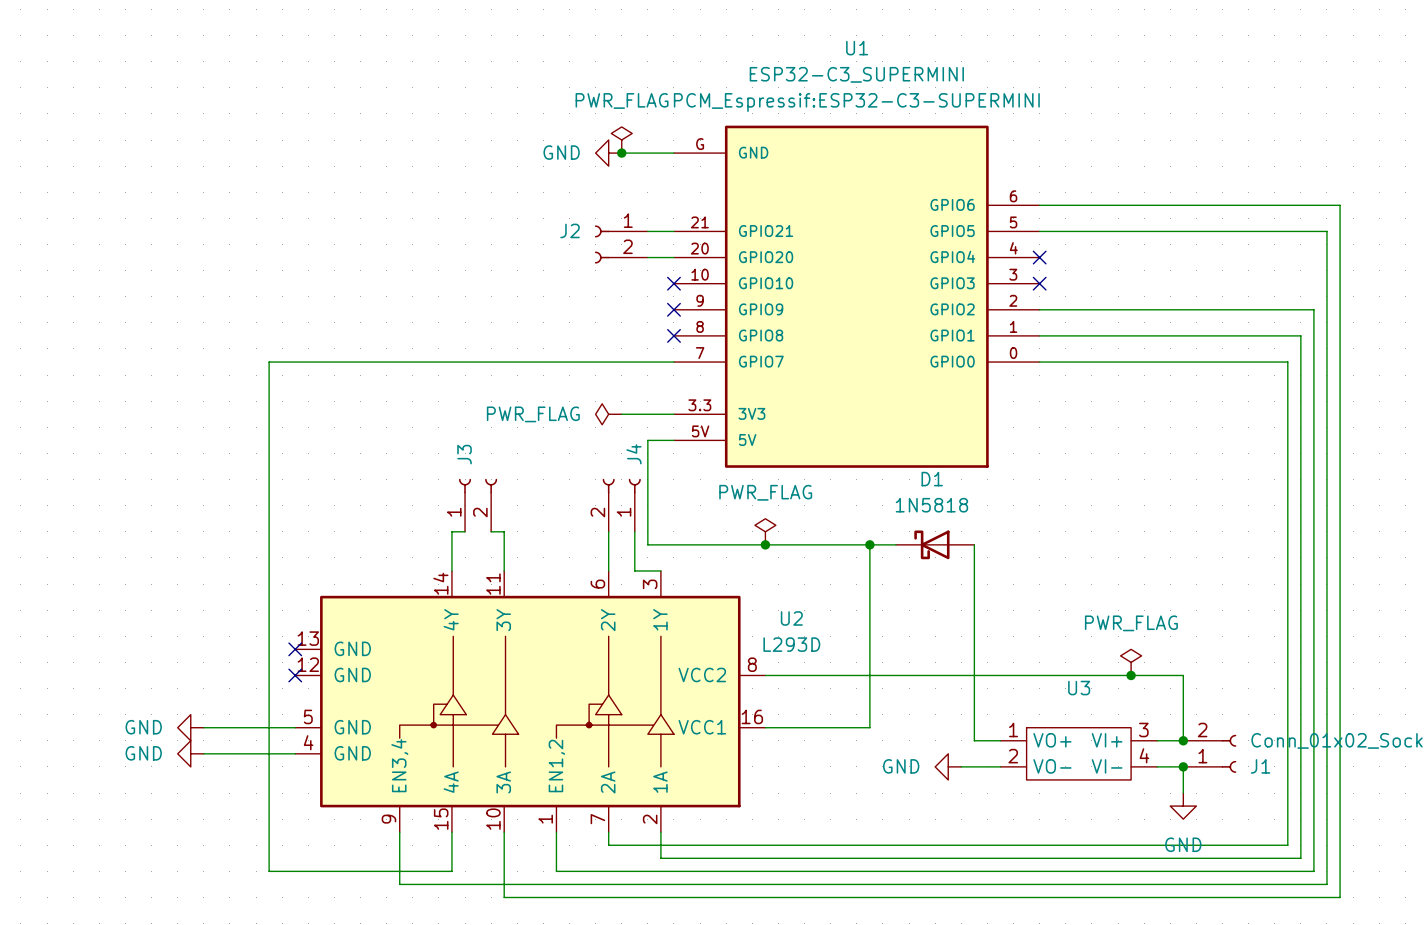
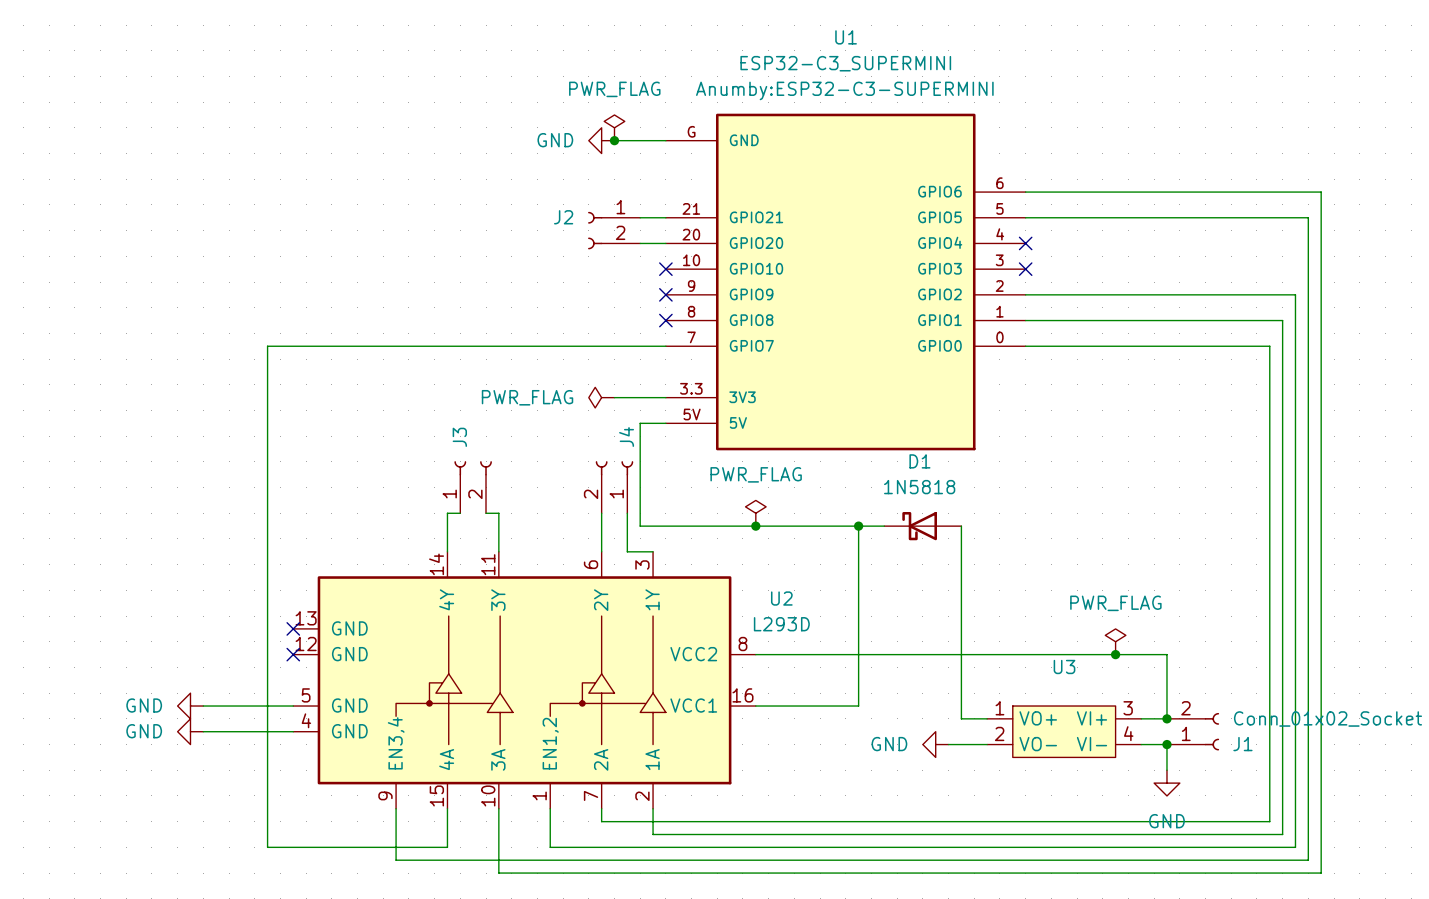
U1 text: PCM_Espressif:ESP32-C3-SUPERMINI (856, 102) -> Anumby:ESP32-C3-SUPERMINI (844, 90)
U3 symbol: [1000, 727, 1158, 780] -> [987, 706, 1142, 758]

